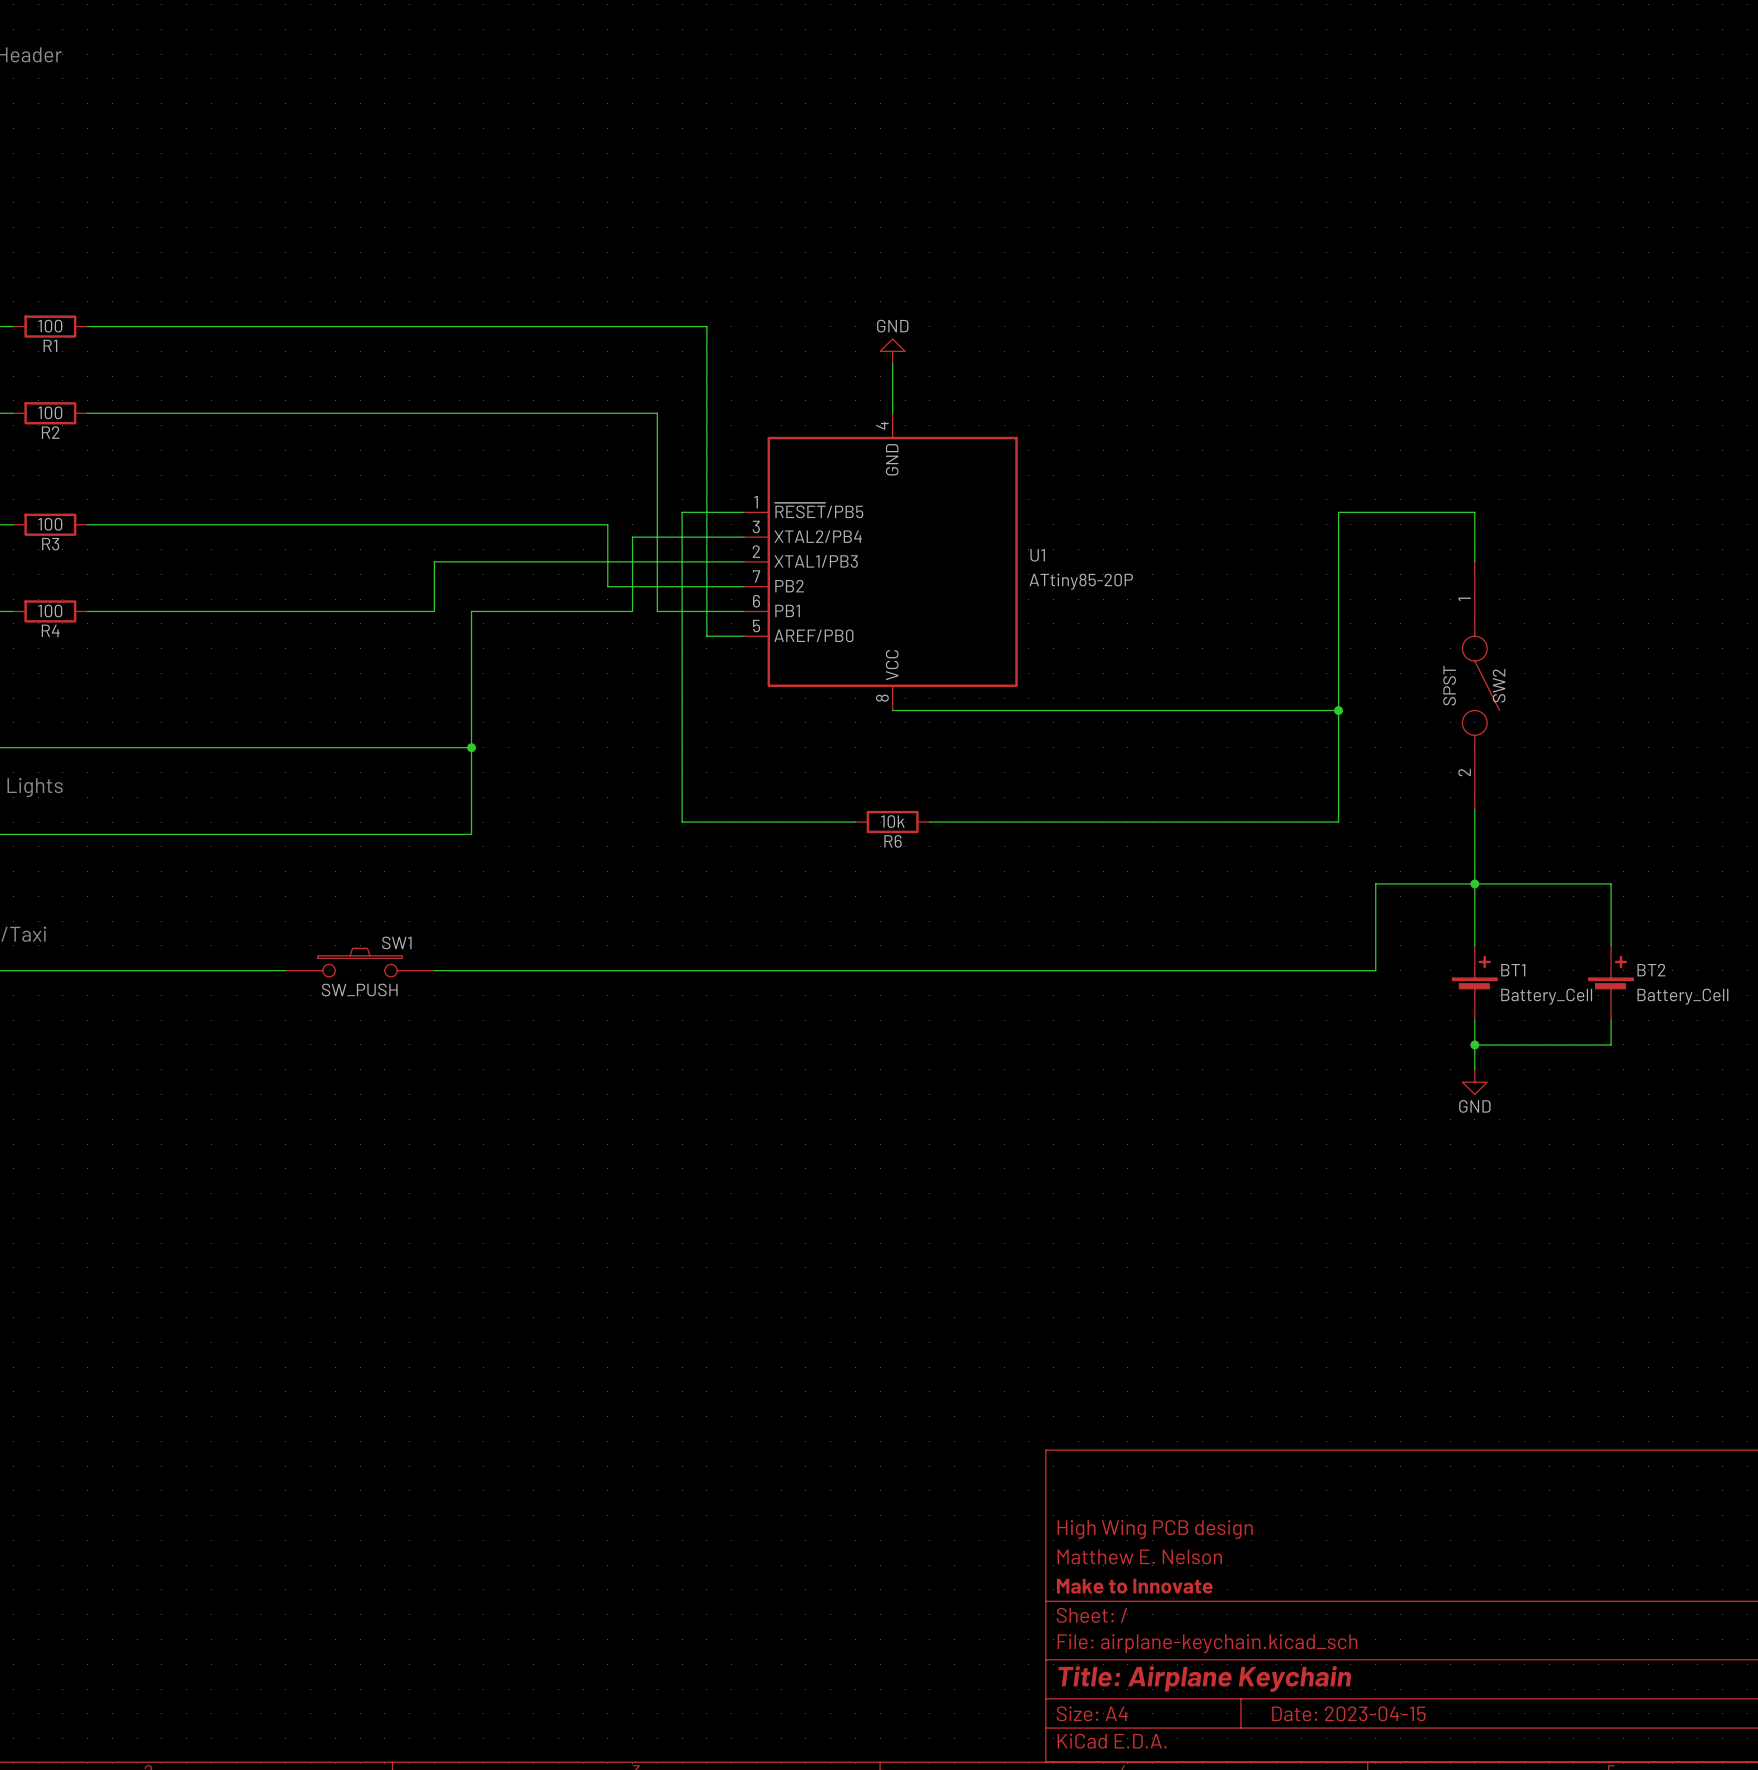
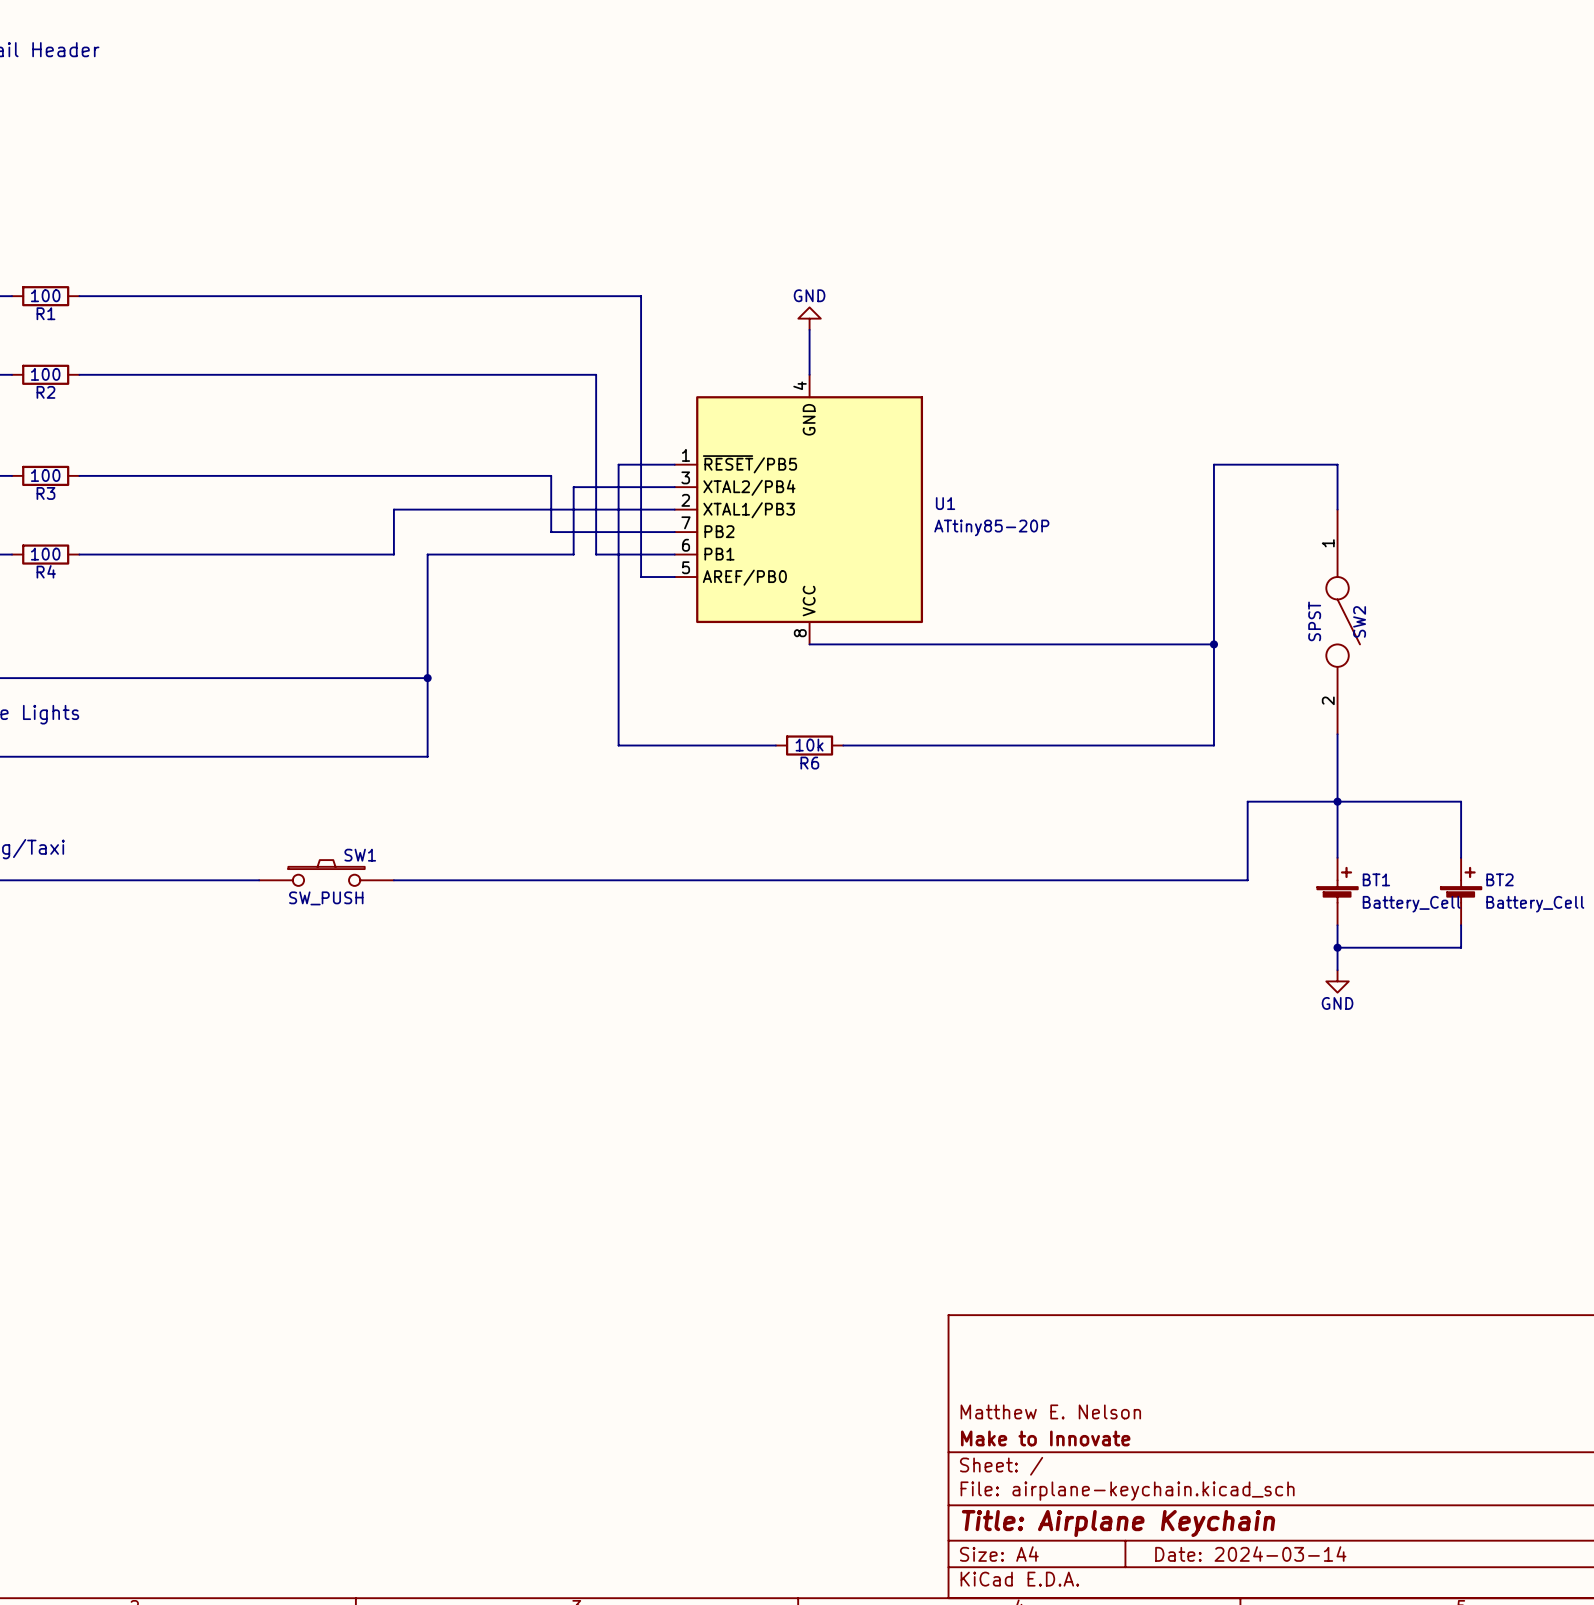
title block: High Wing PCB design (1155, 1529) -> none
title block: Date: 2023-04-15 (1348, 1713) -> Date: 2024-03-14 (1250, 1554)

